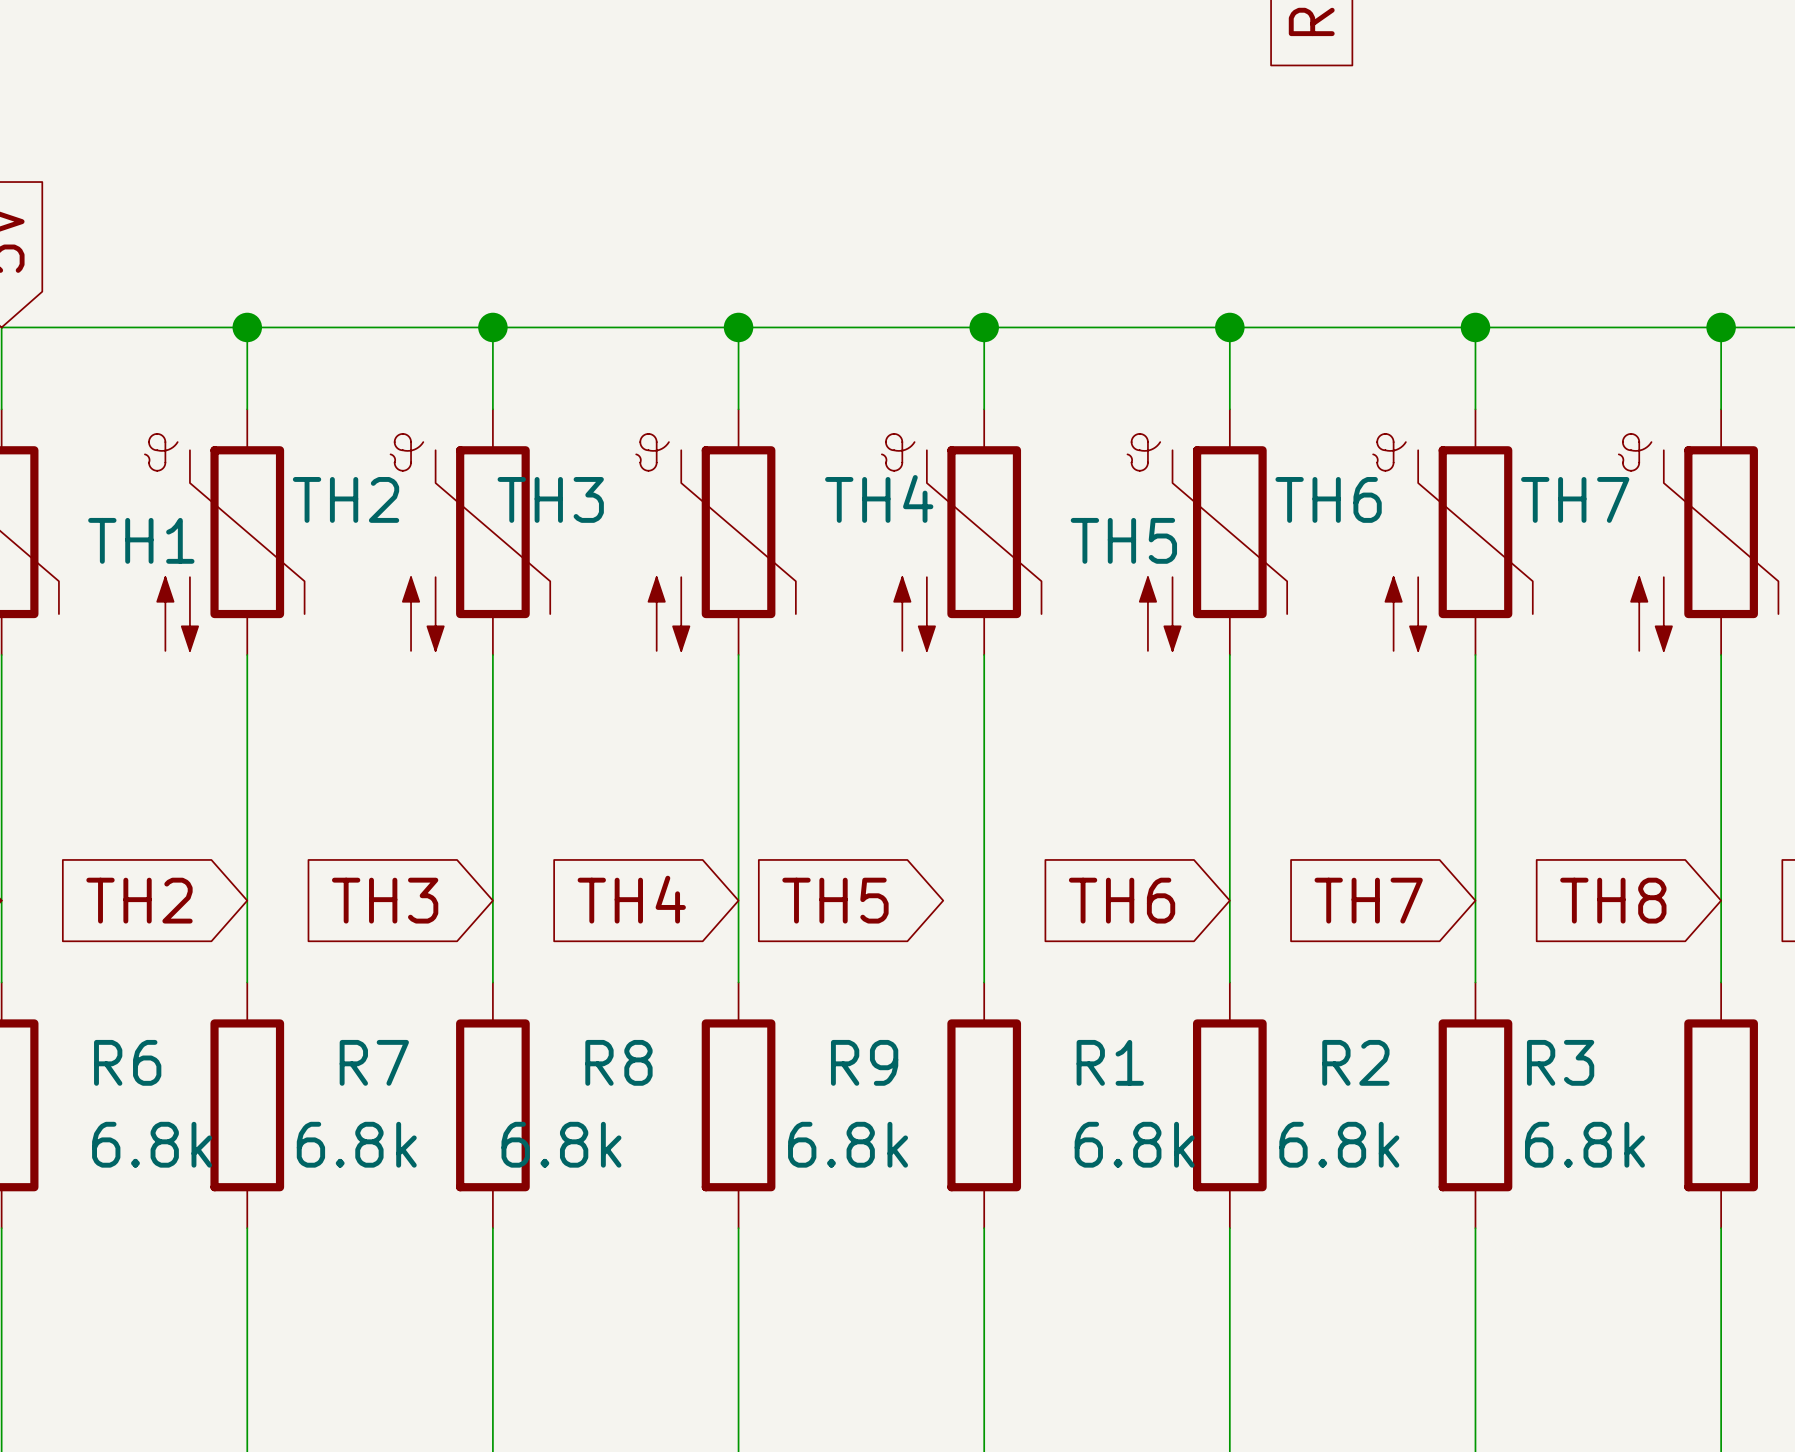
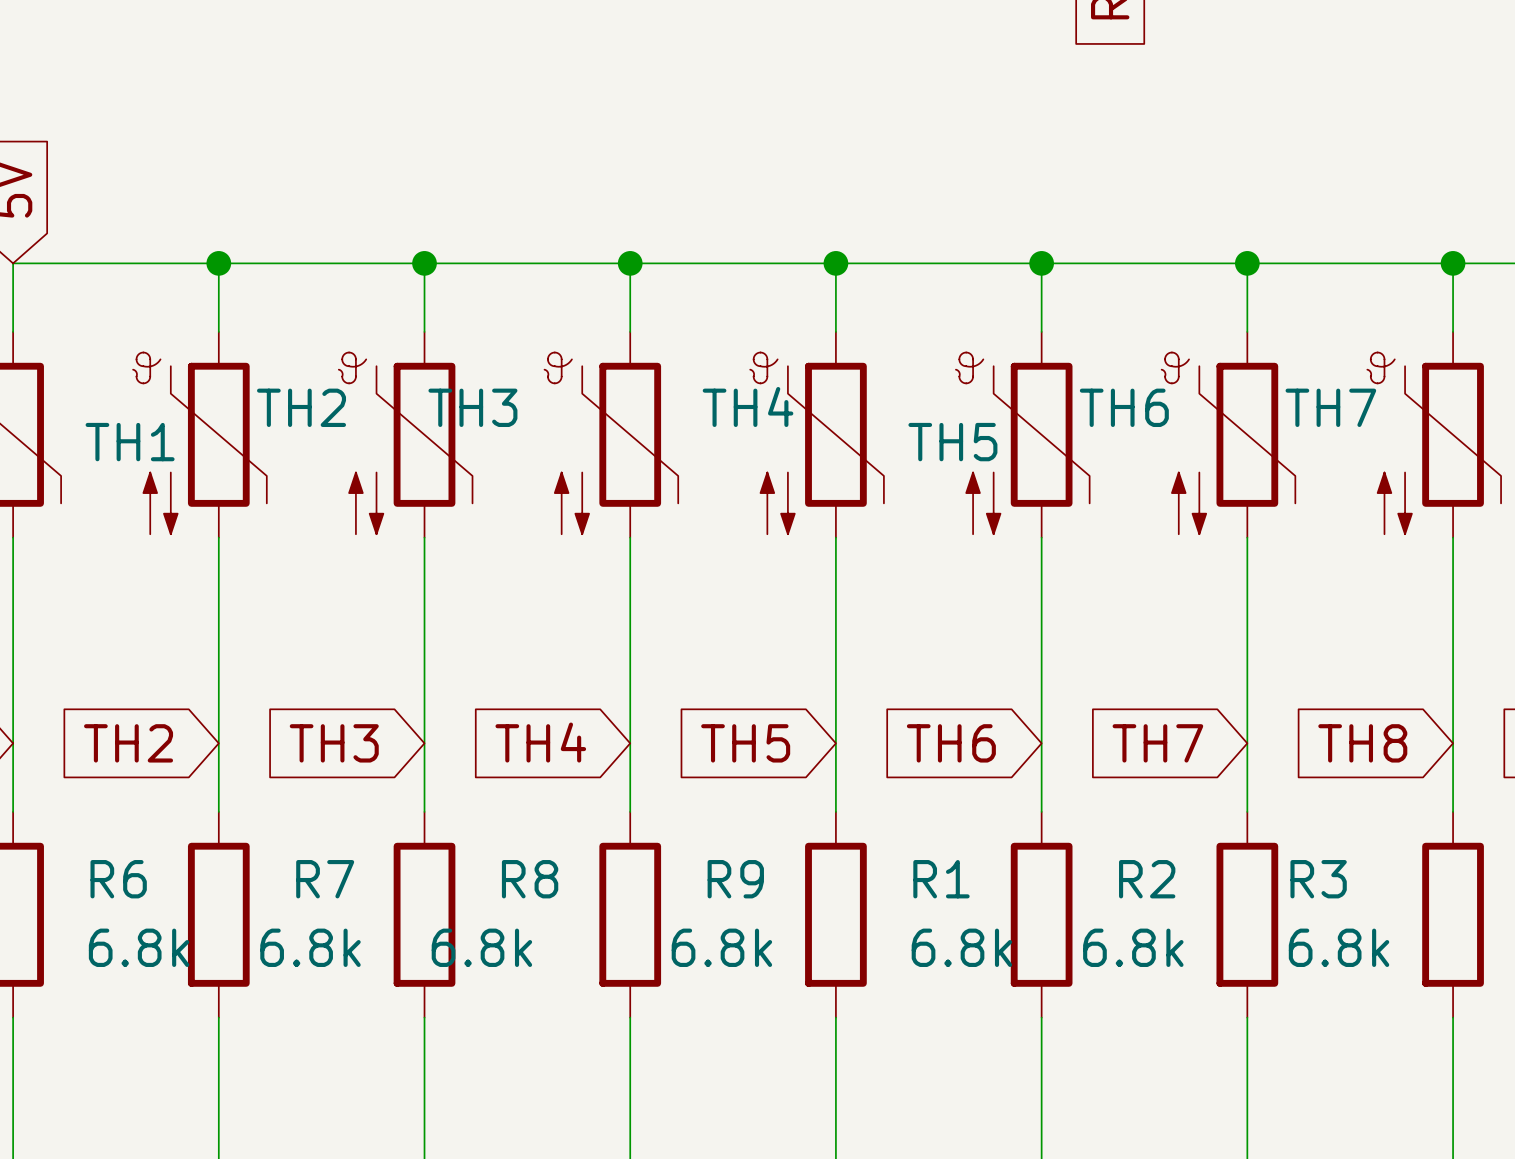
global label position: TH5 (835, 900) -> TH5 (745, 743)

